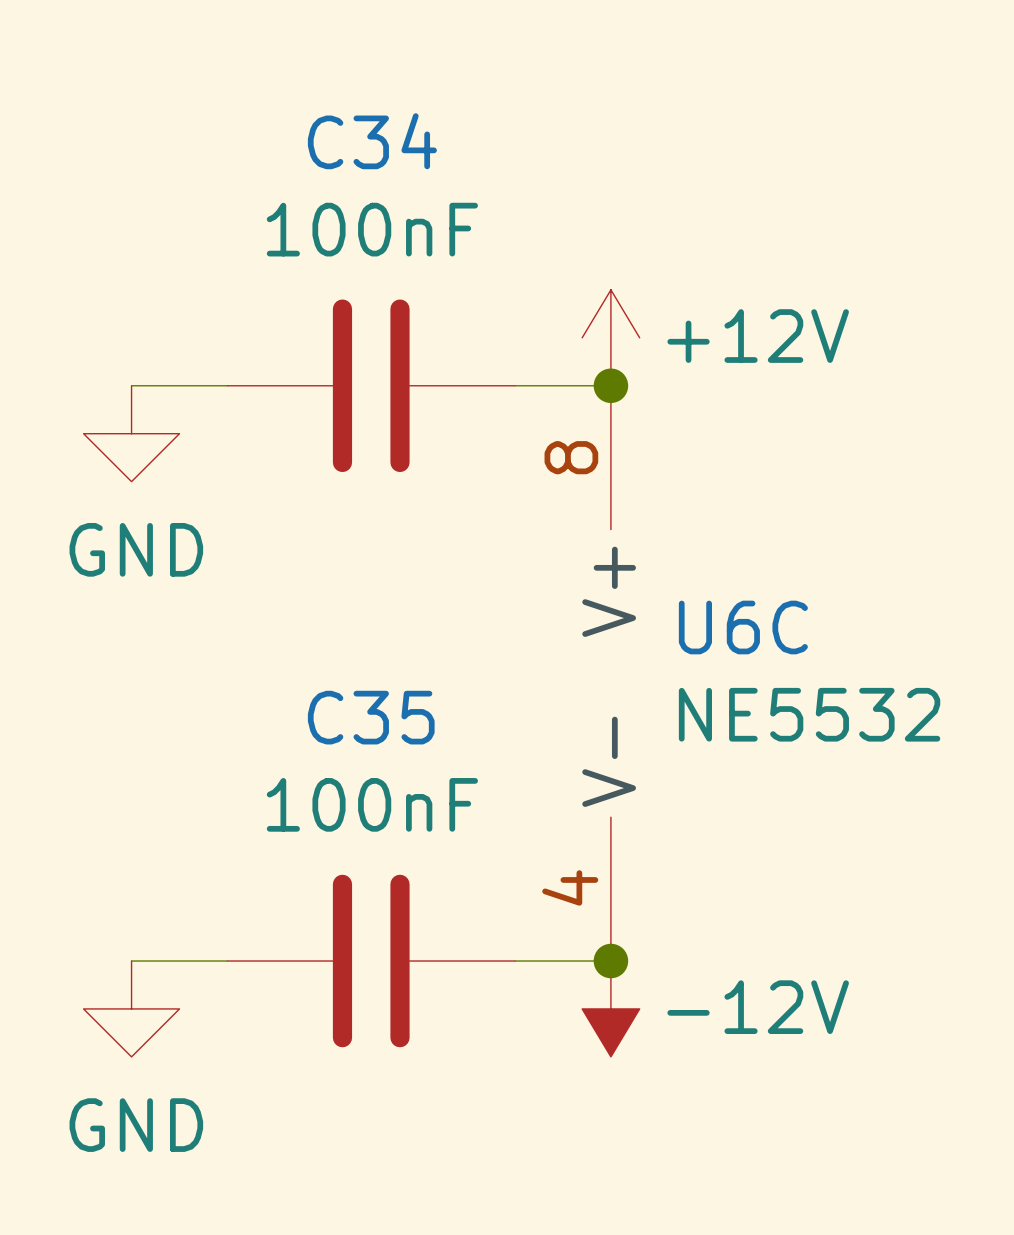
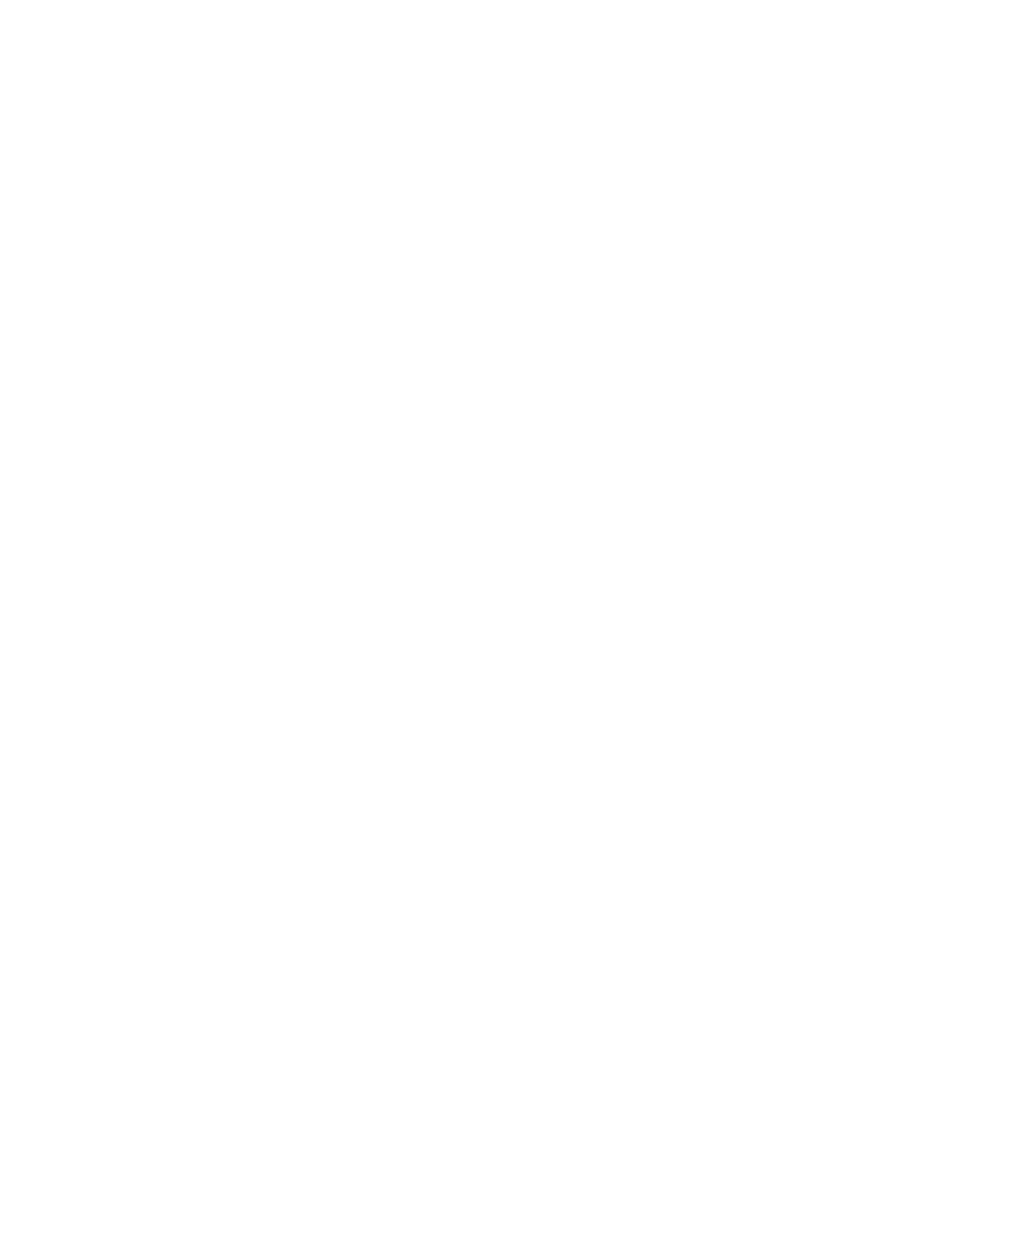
power symbol: +12V (610, 337) -> none
wire: (131, 385) (227, 385) -> none
C34: 100nF (371, 385) -> none
wire: (515, 385) (610, 385) -> none
junction: (610, 385) -> none
power symbol: GND (131, 433) -> none
U6C: NE5532 (610, 673) -> none
wire: (131, 961) (227, 961) -> none
C35: 100nF (371, 961) -> none
wire: (515, 961) (610, 961) -> none
junction: (610, 961) -> none
power symbol: GND (131, 1008) -> none
power symbol: -12V (610, 1008) -> none

